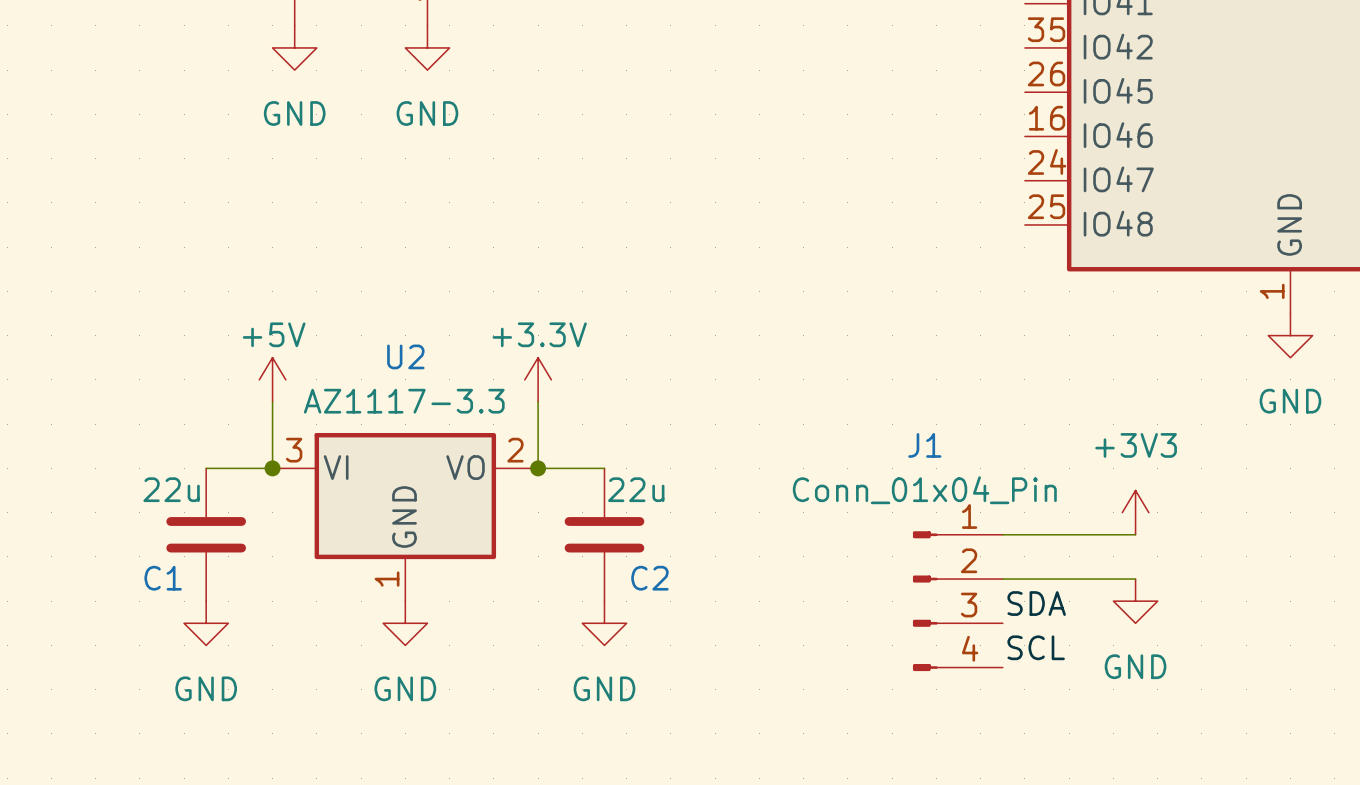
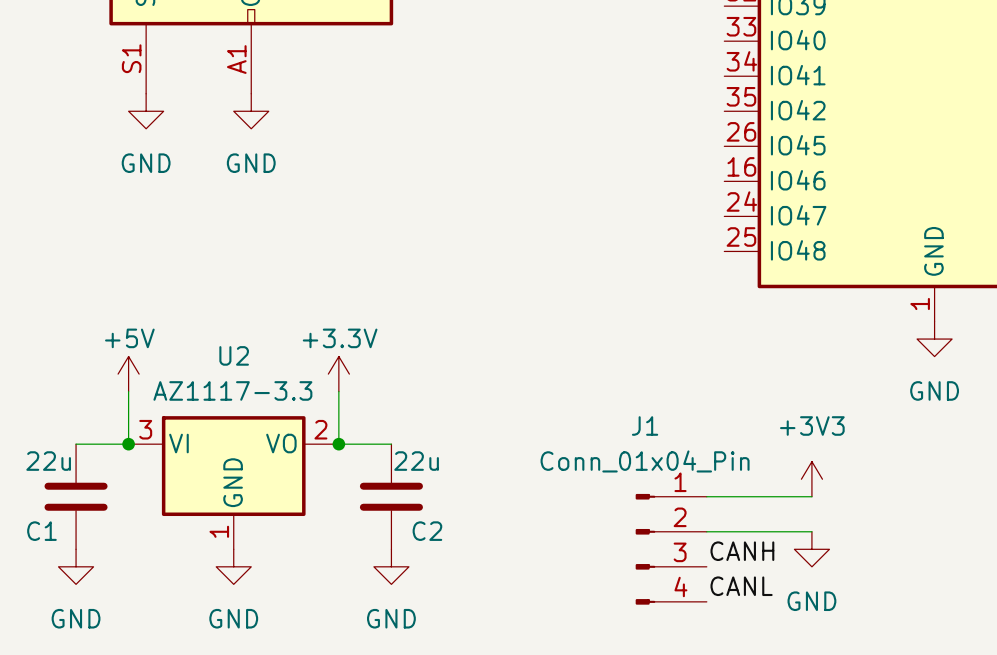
label: SDA (1036, 603) -> CANH (742, 551)
label: SCL (1036, 647) -> CANL (741, 586)

